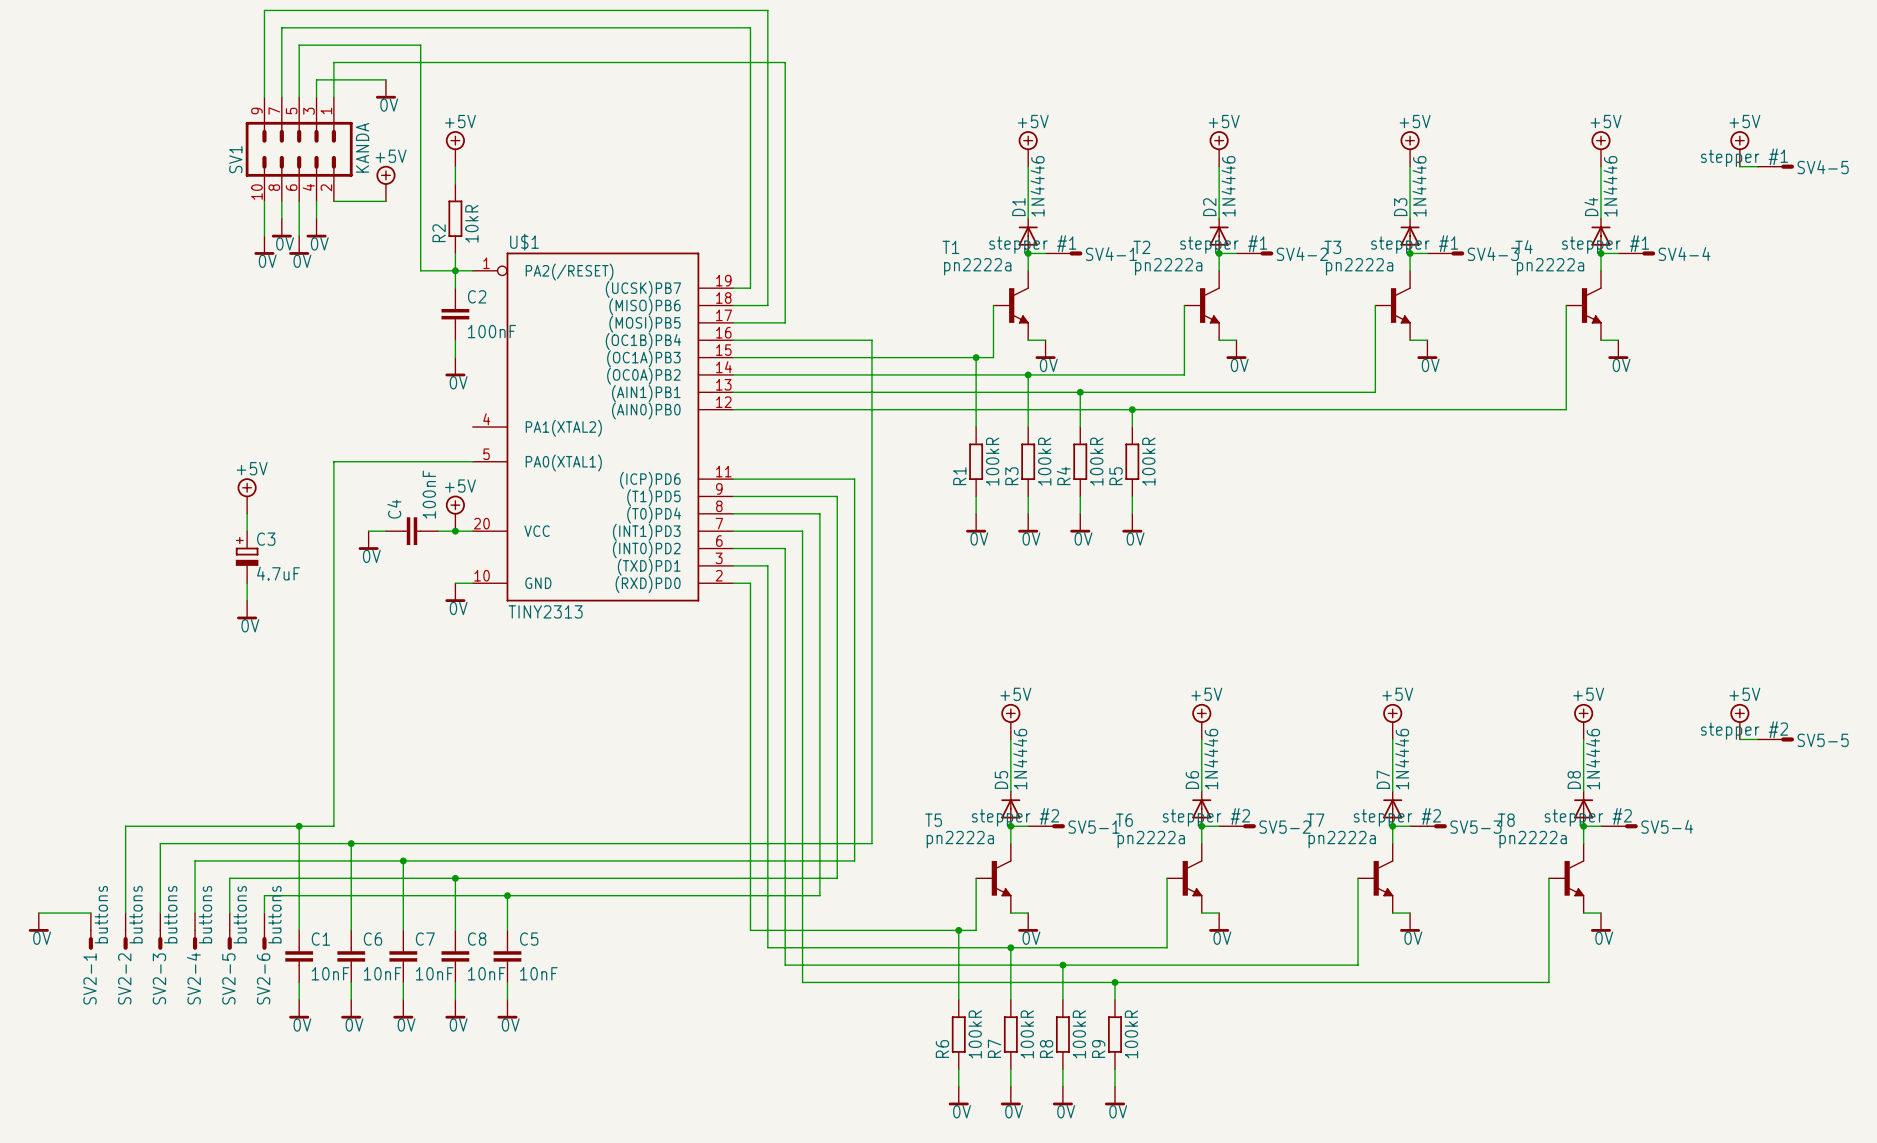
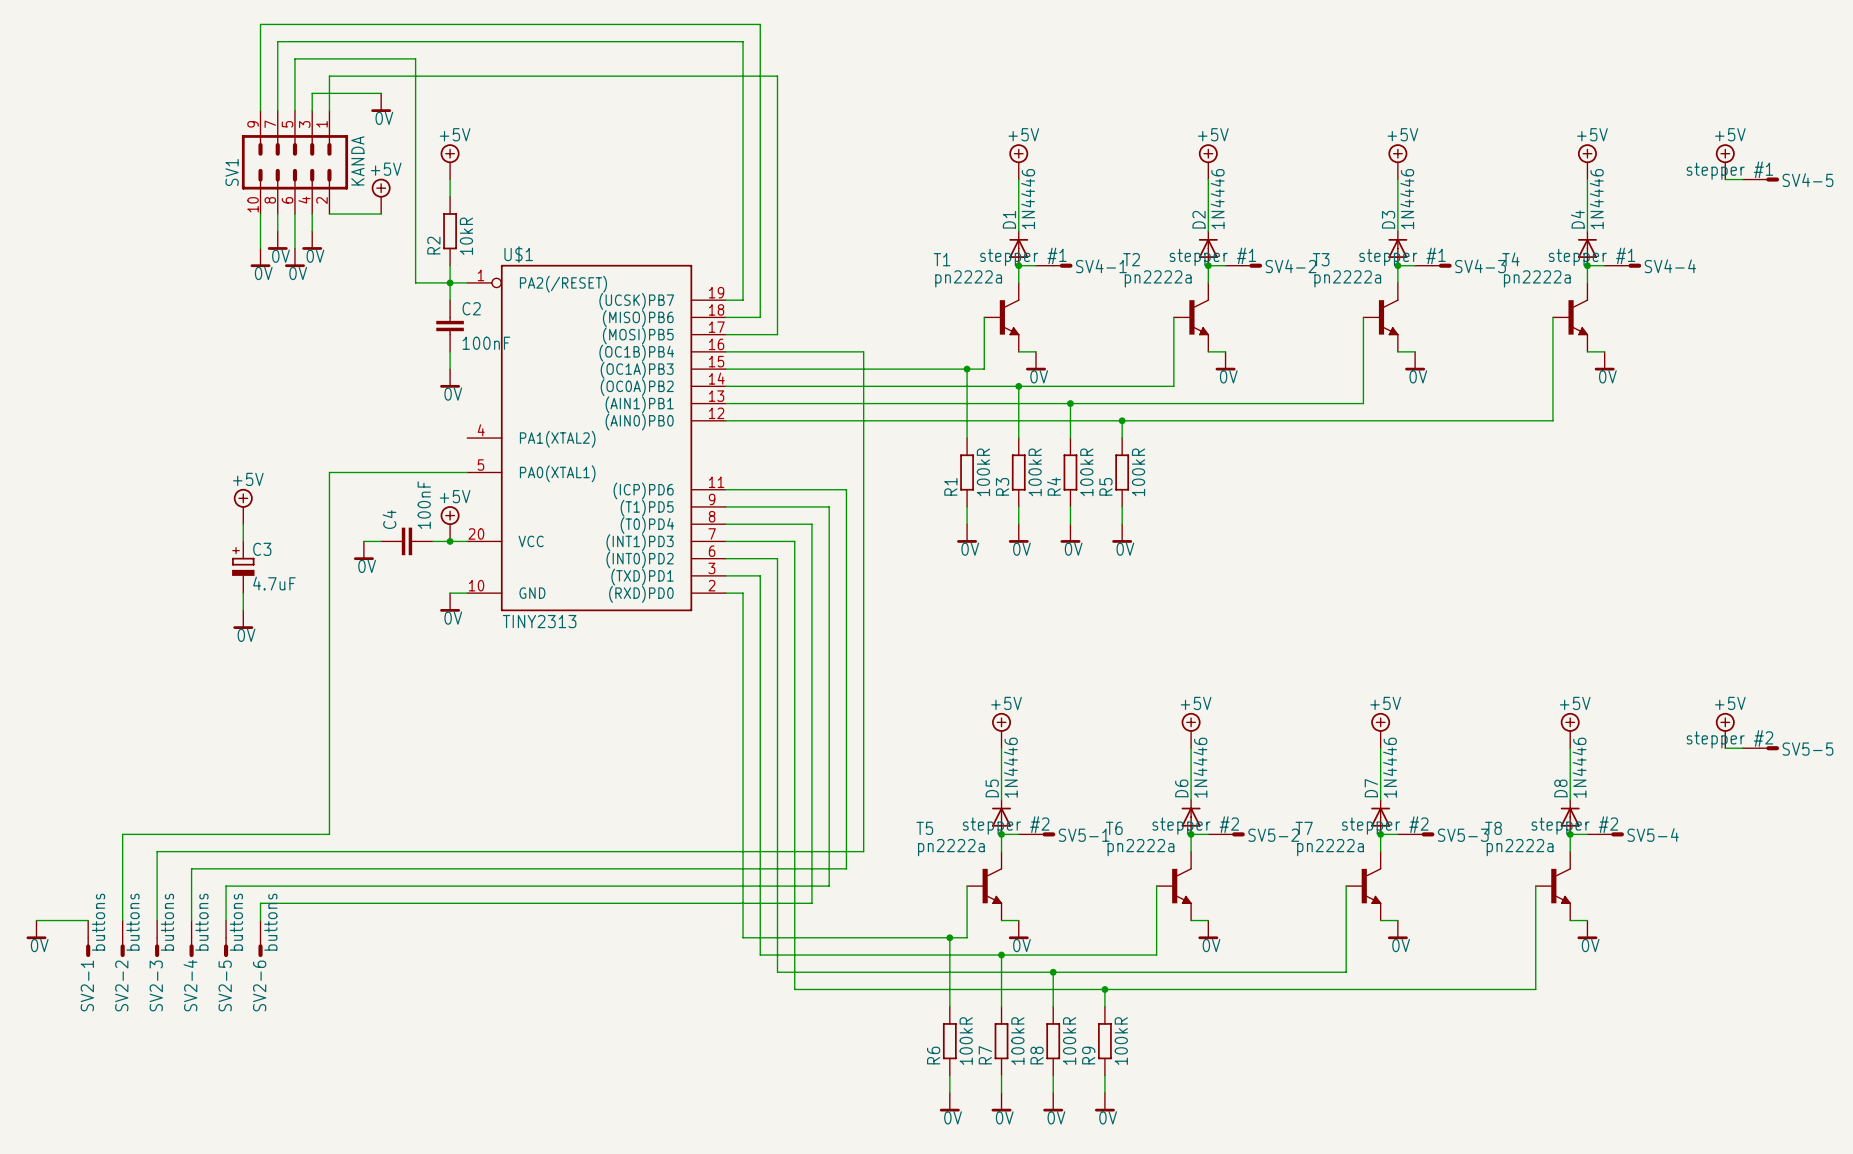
wire: (299, 826) (299, 930) -> none
junction: (299, 826) -> none
wire: (351, 843) (351, 930) -> none
junction: (351, 843) -> none
wire: (403, 860) (403, 930) -> none
junction: (403, 860) -> none
wire: (455, 878) (455, 930) -> none
junction: (455, 878) -> none
wire: (507, 895) (507, 930) -> none
junction: (507, 895) -> none
C1: 10nF (299, 956) -> none
C6: 10nF (351, 956) -> none
C7: 10nF (403, 956) -> none
C8: 10nF (455, 956) -> none
C5: 10nF (507, 956) -> none
wire: (299, 982) (299, 999) -> none
wire: (351, 982) (351, 999) -> none
wire: (403, 982) (403, 999) -> none
wire: (455, 982) (455, 999) -> none
wire: (507, 982) (507, 999) -> none
power symbol: 0V (299, 1009) -> none
power symbol: 0V (351, 1009) -> none
power symbol: 0V (403, 1009) -> none
power symbol: 0V (455, 1009) -> none
power symbol: 0V (507, 1009) -> none

